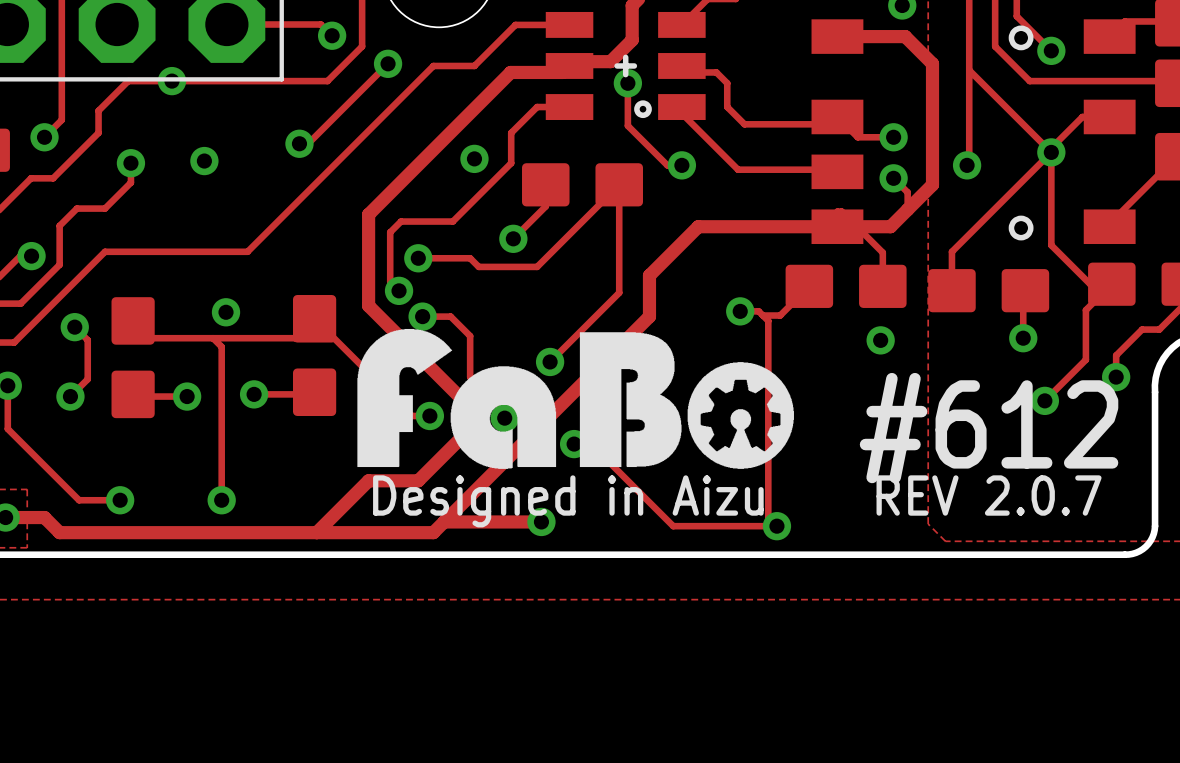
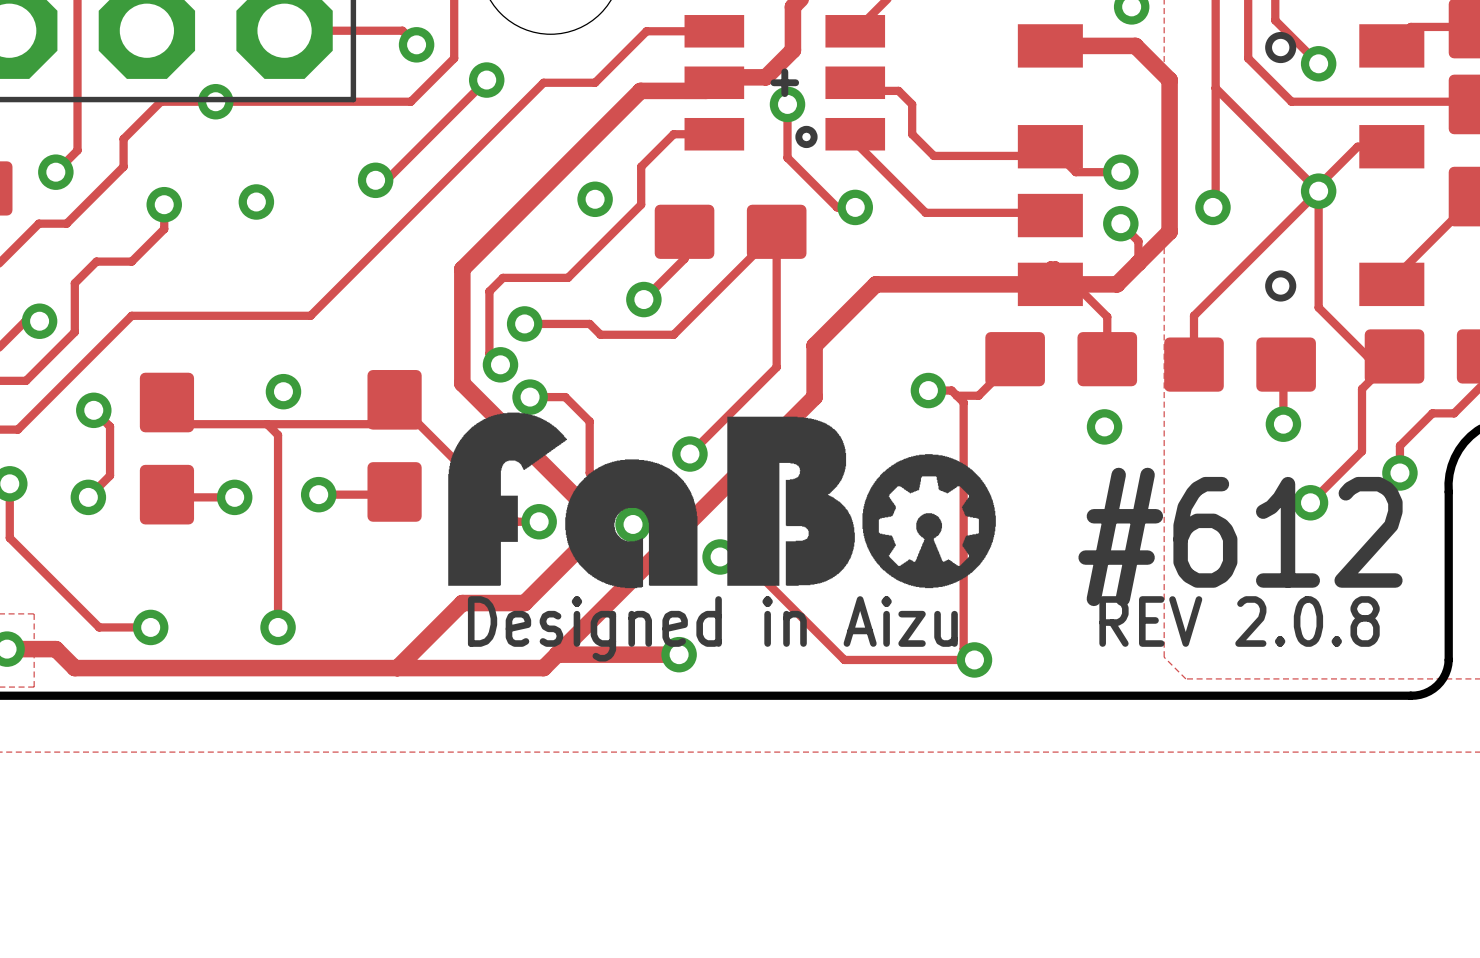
text: REV 2.0.7 (989, 495) -> REV 2.0.8 (1239, 621)

